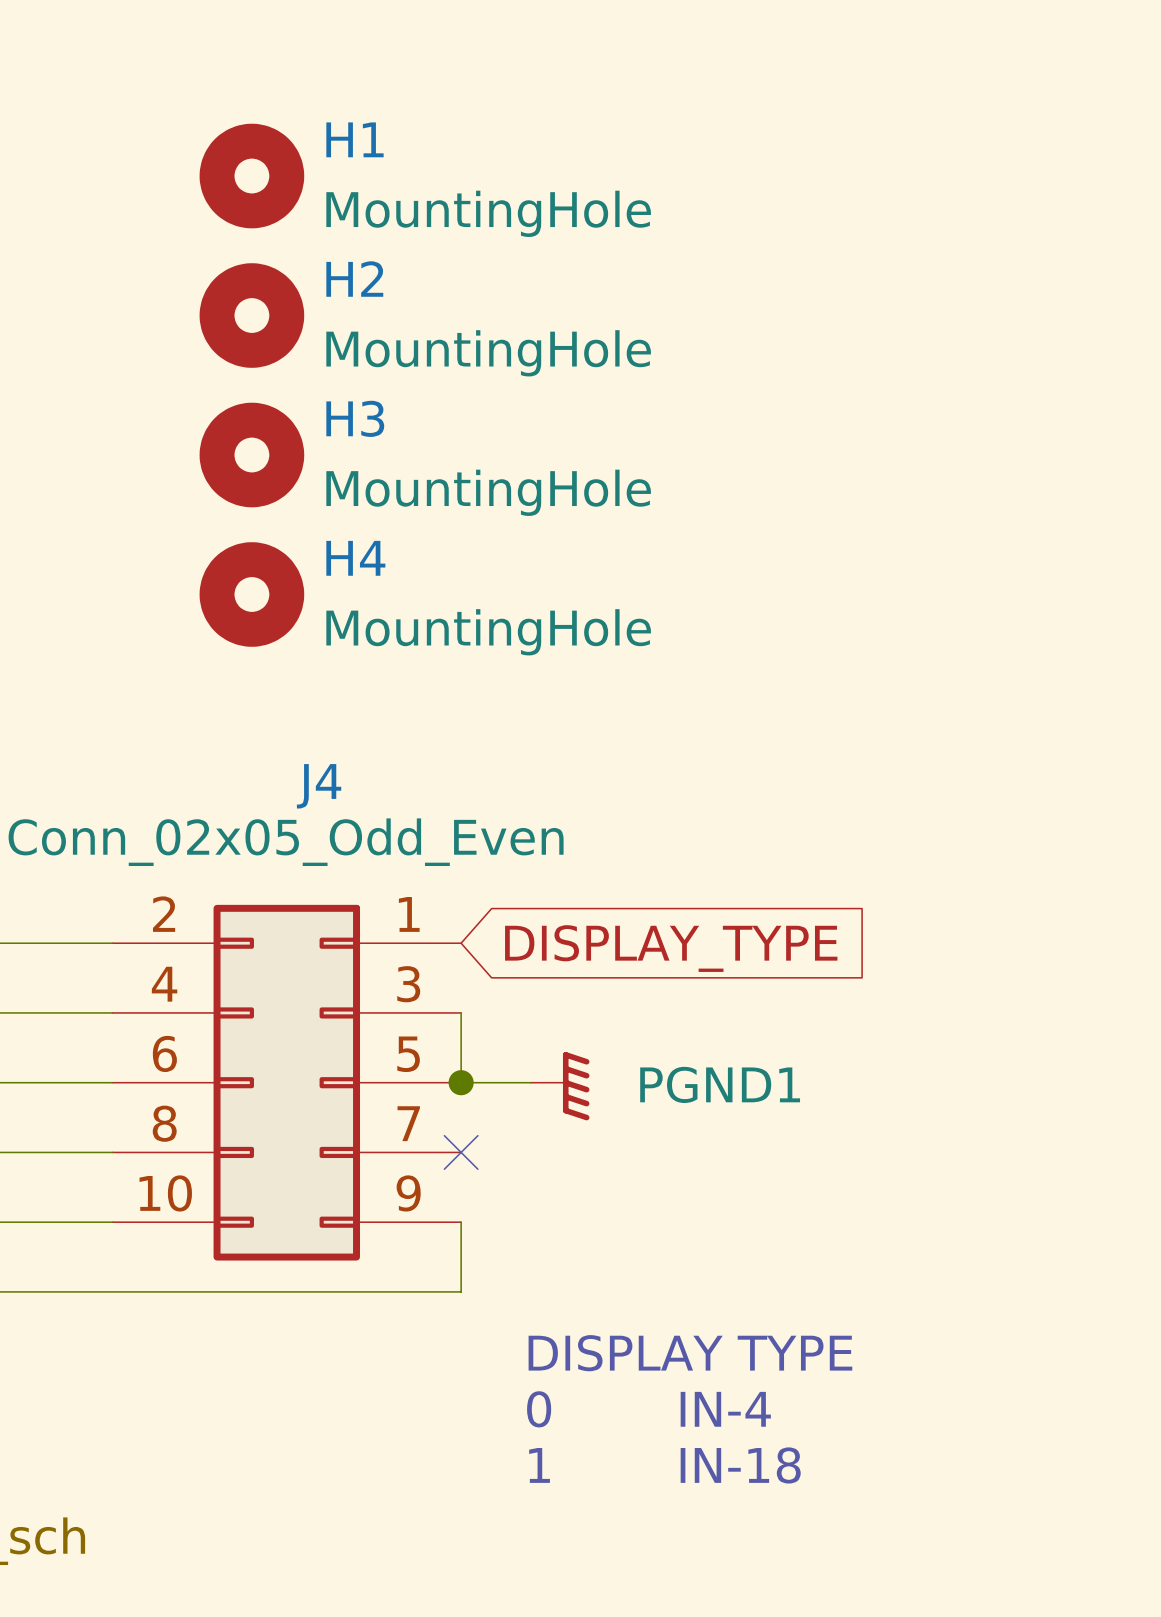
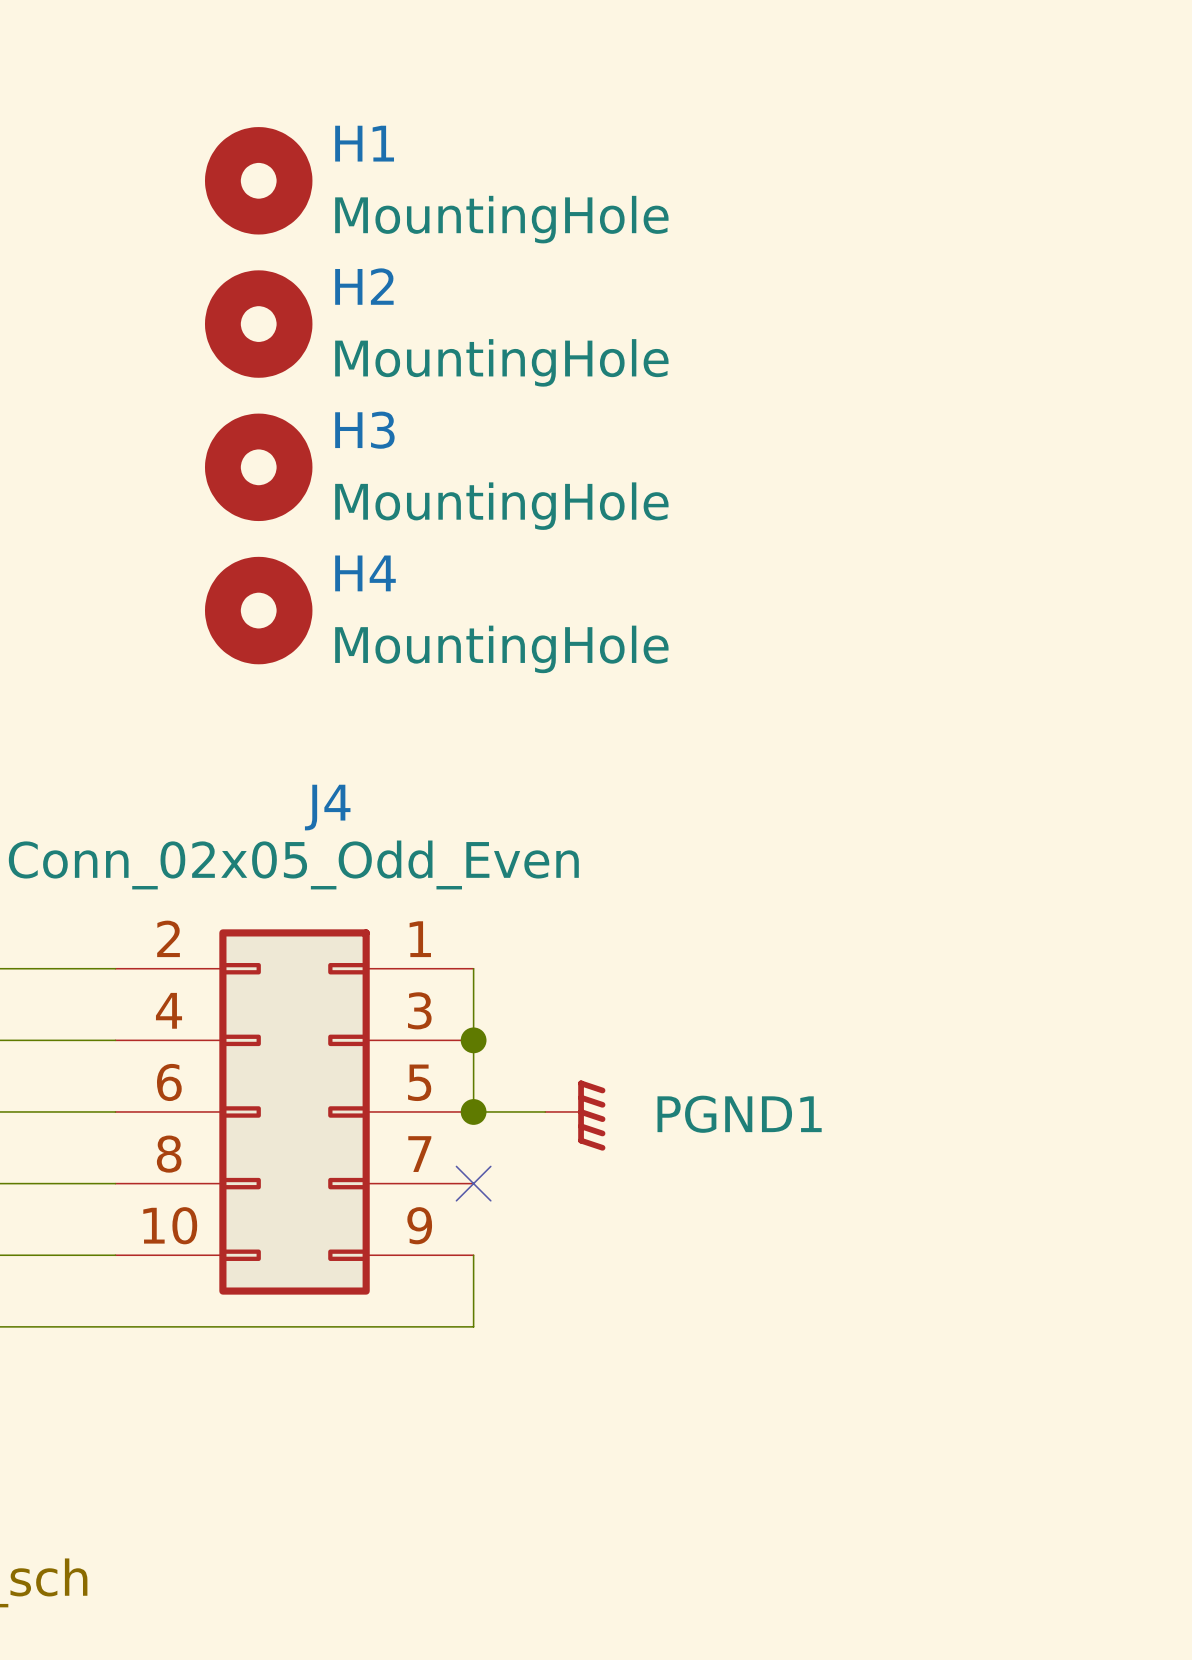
wire: none -> (473, 968) (473, 1040)
global label: DISPLAY_TYPE (671, 948) -> none
junction: none -> (473, 1040)
text: DISPLAY TYPE (690, 1353) -> none
text: 0 IN-4 (648, 1409) -> none
text: 1 IN-18 (664, 1465) -> none

